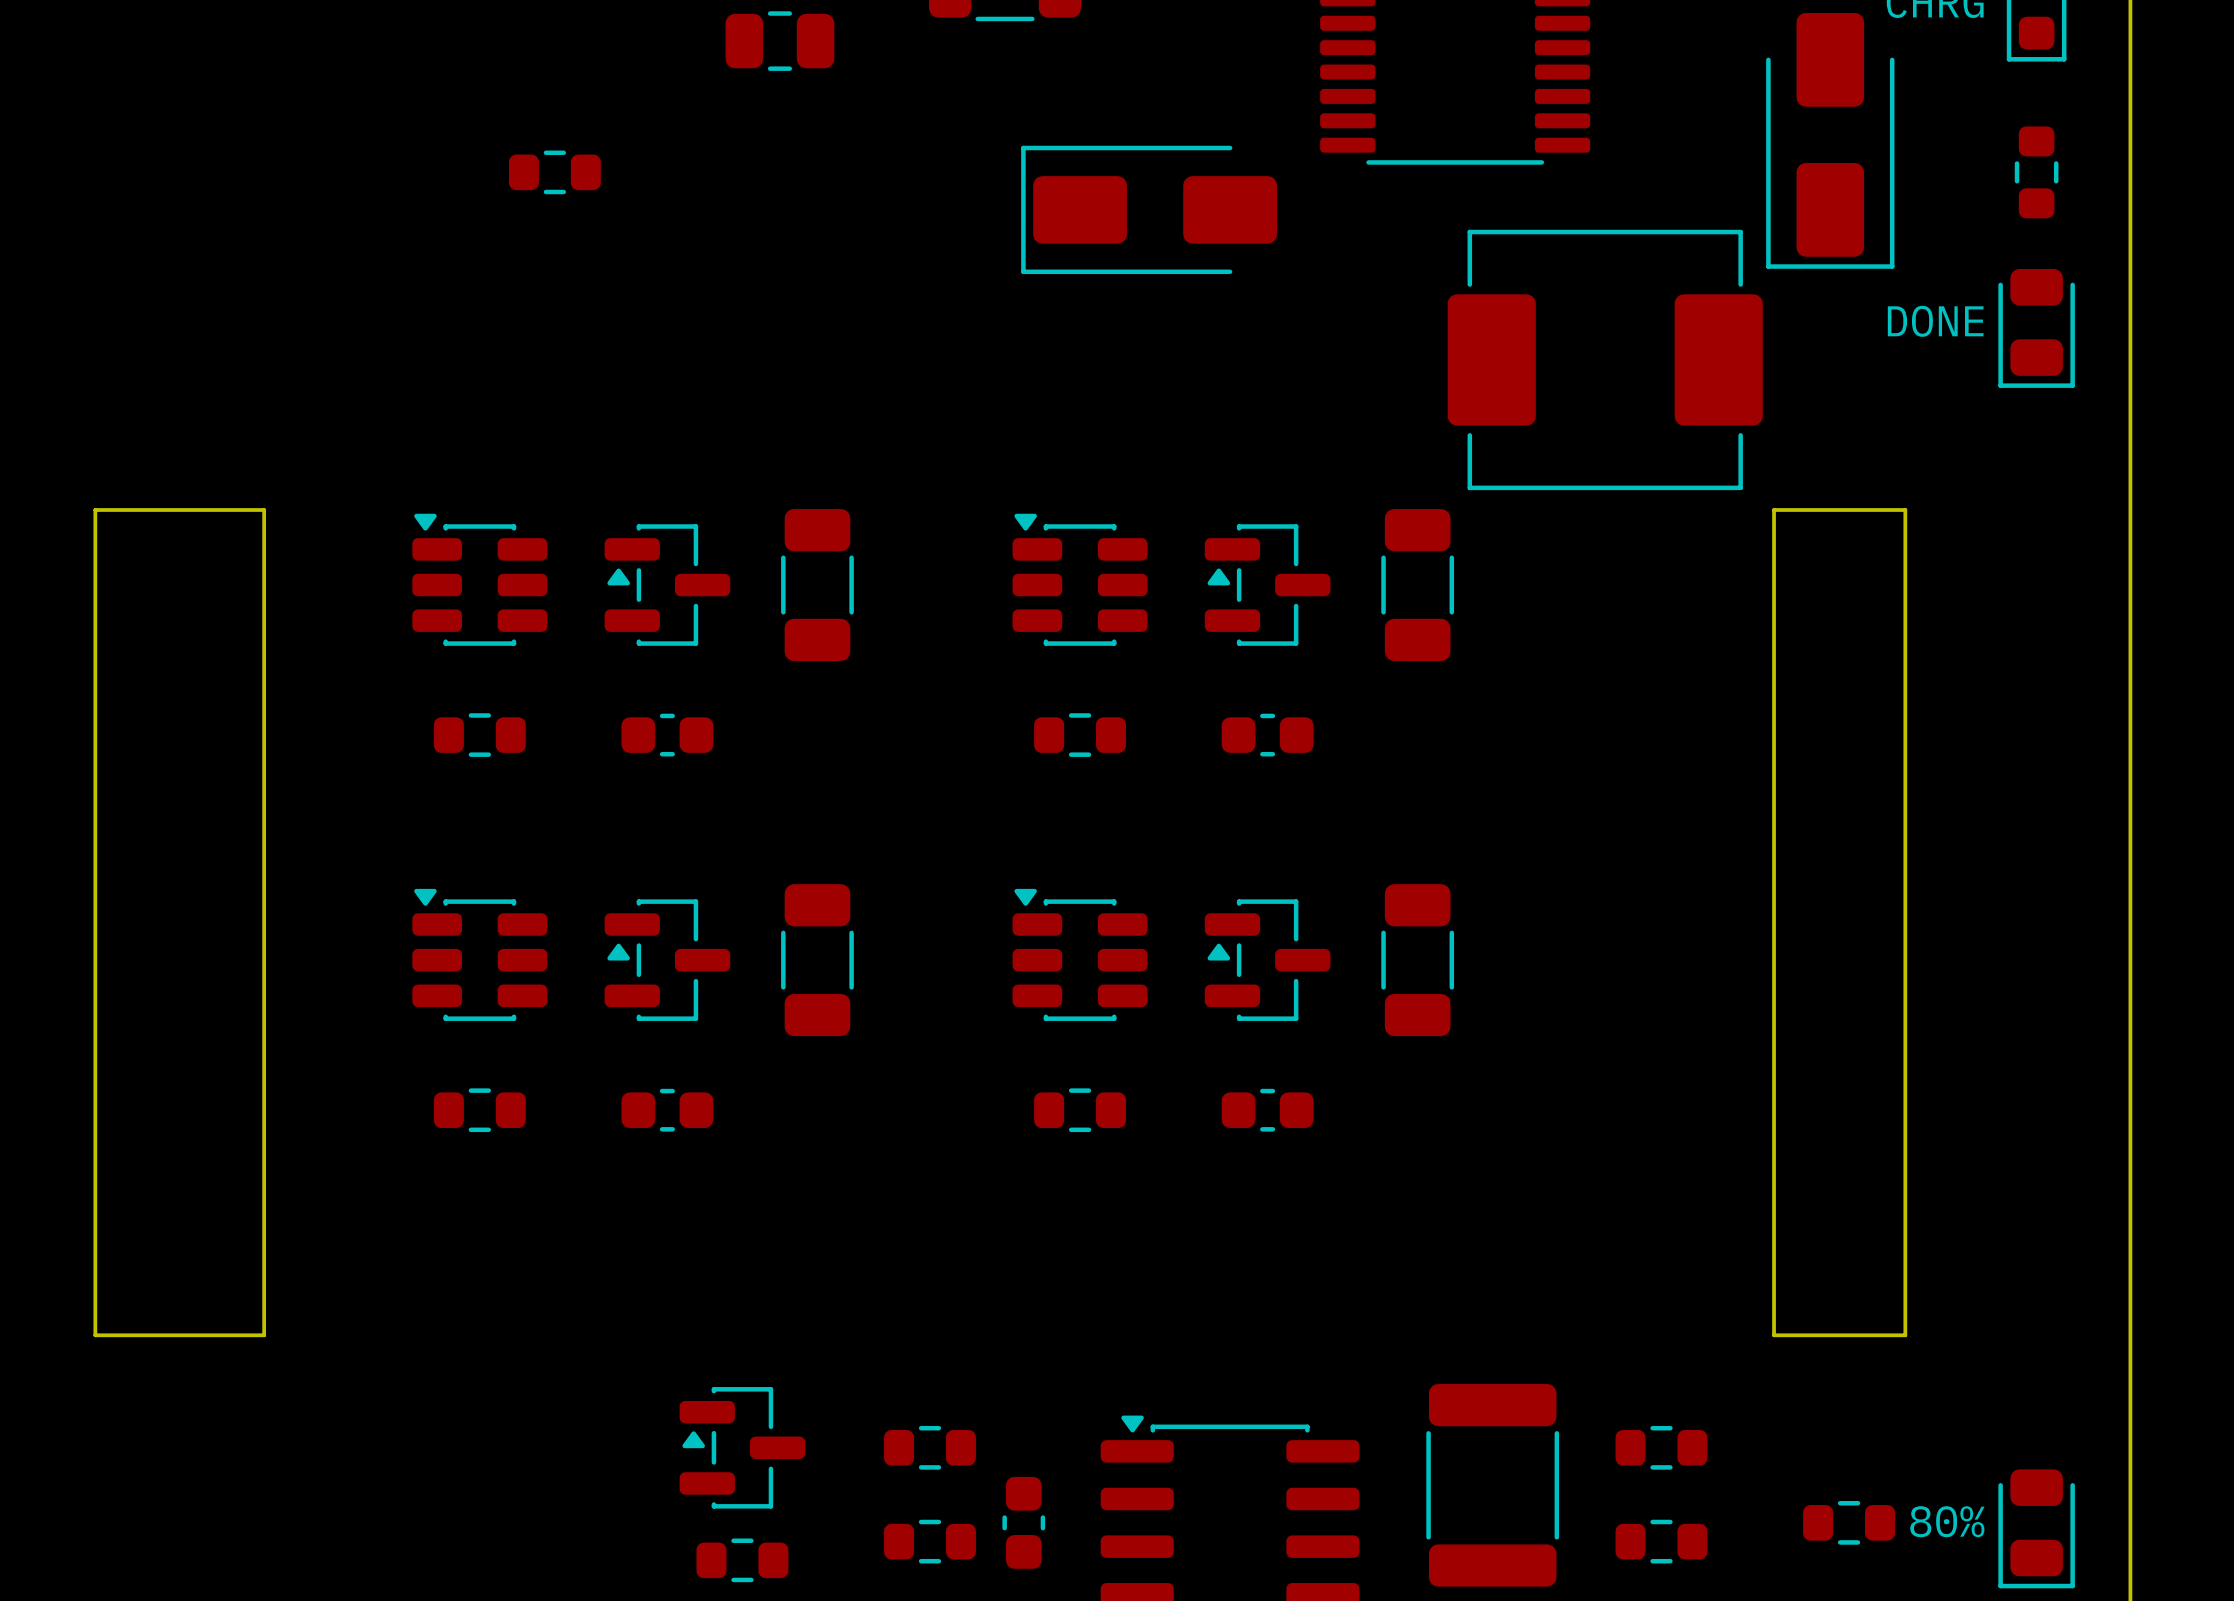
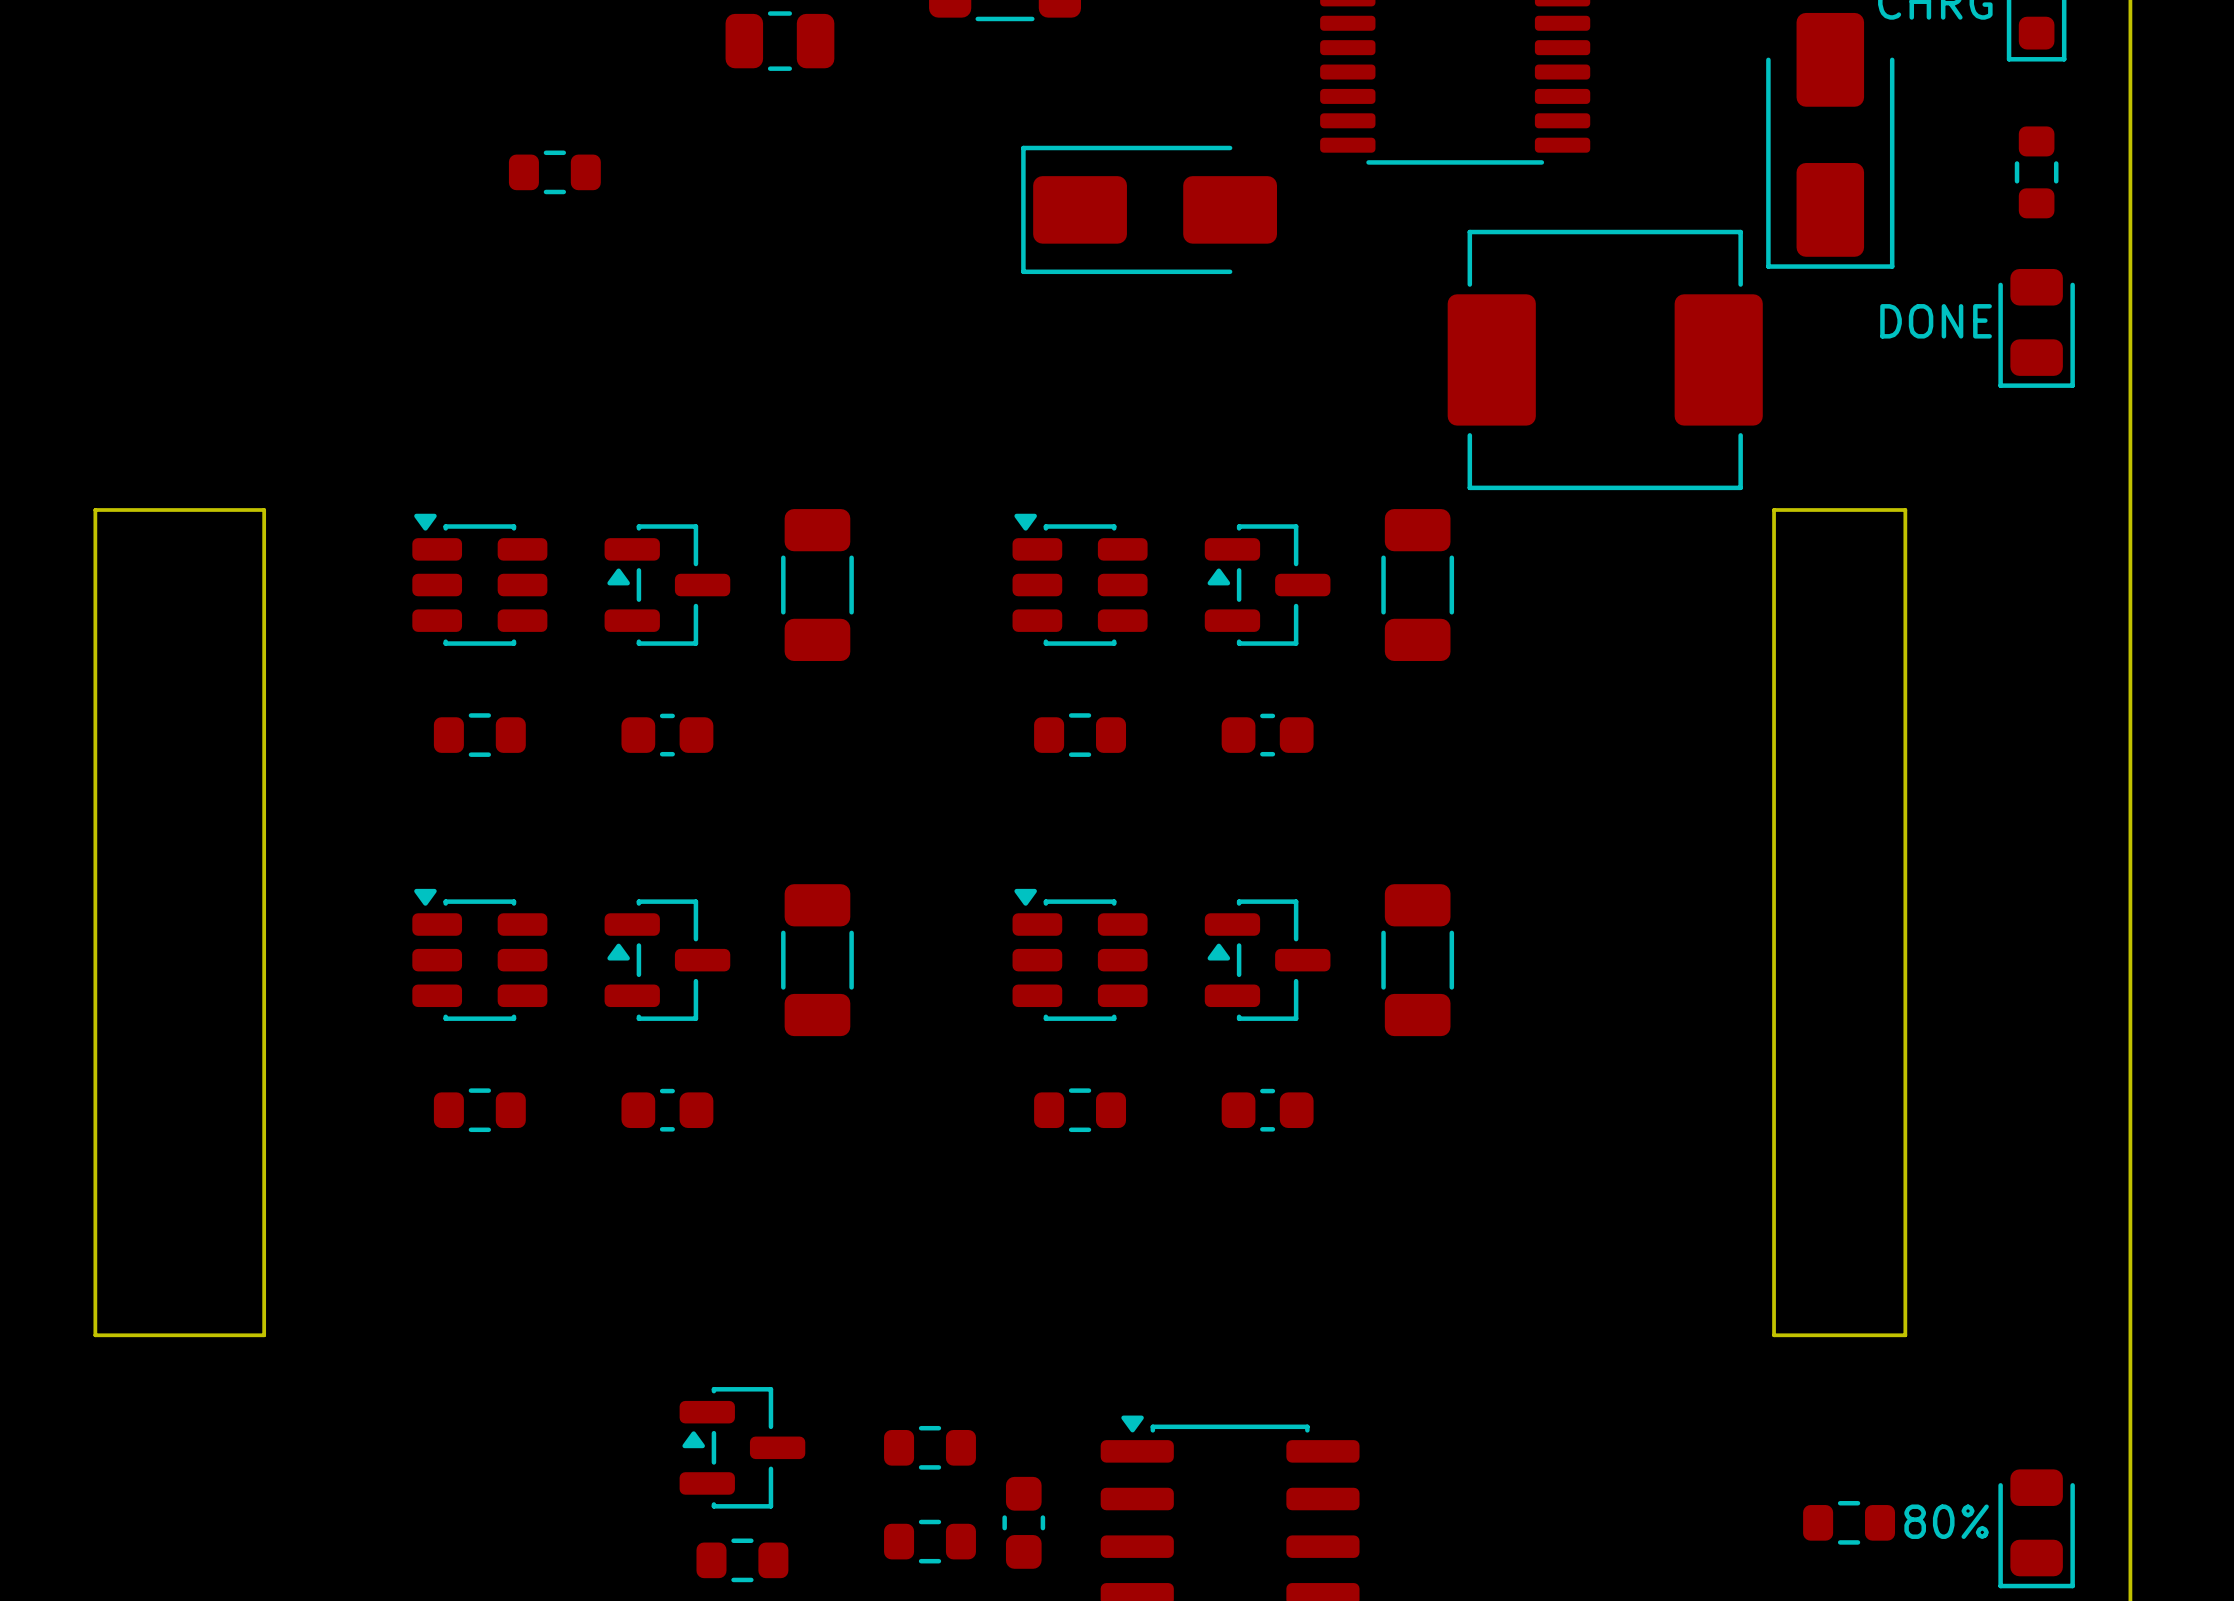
part: (1661, 1447) -> none
part: (1492, 1485) -> none
part: (1661, 1541) -> none

